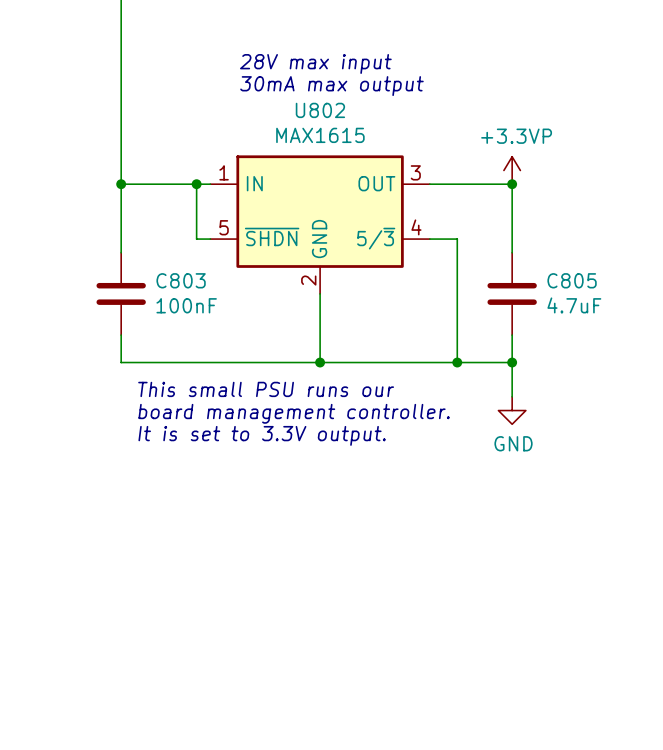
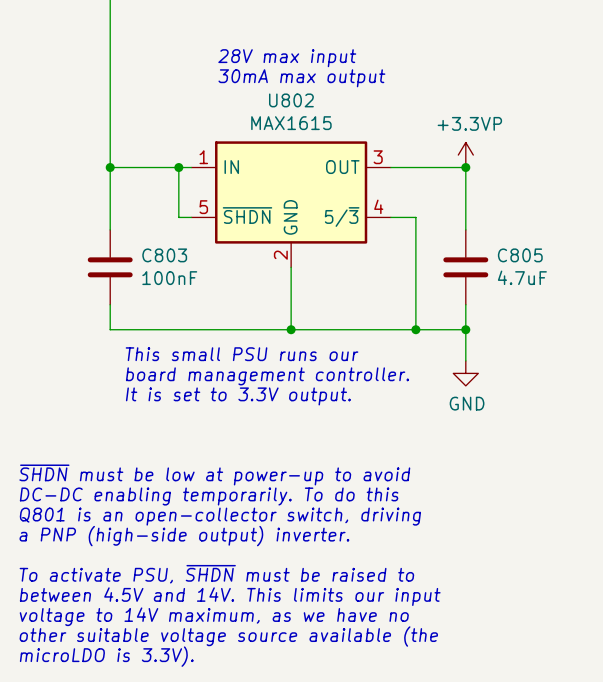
text: none -> ~{SHDN} must be low at power-up to avoid (214, 474)
text: none -> DC-DC enabling temporarily. To do this (209, 496)
text: none -> Q801 is an open-collector switch, driving (220, 516)
text: none -> a PNP (high-side output) inverter. (184, 536)
text: none -> To activate PSU, ~{SHDN} must be raised to (216, 574)
text: none -> between 4.5V and 14V. This limits our input (230, 596)
text: none -> voltage to 14V maximum, as we have no (214, 616)
text: none -> other suitable voltage source available (the (228, 636)
text: none -> microLDO is 3.3V). (106, 656)

